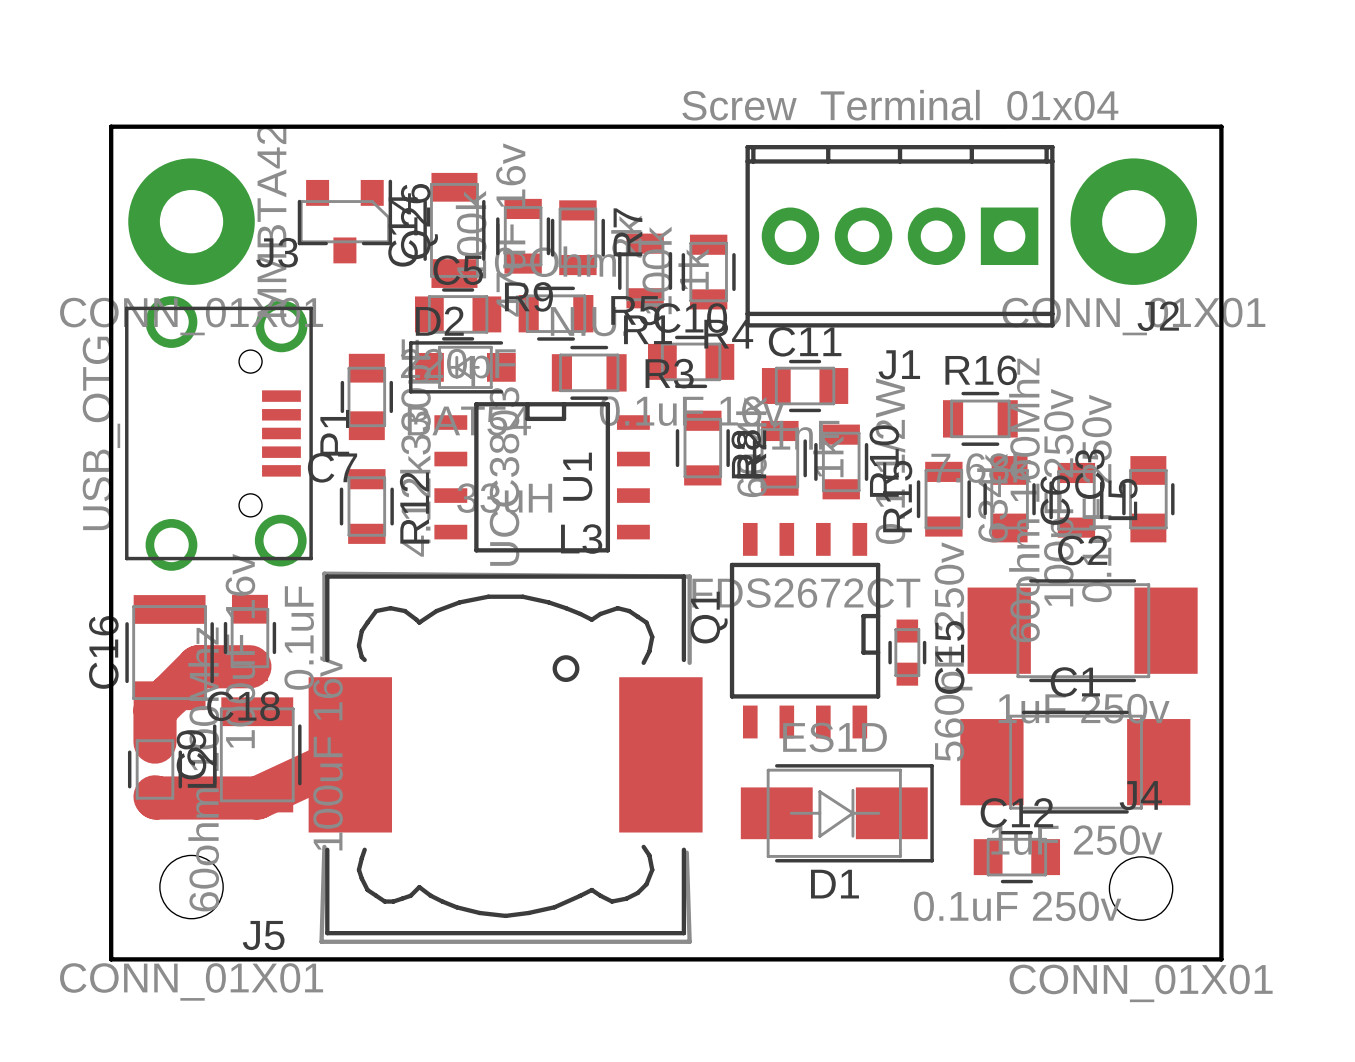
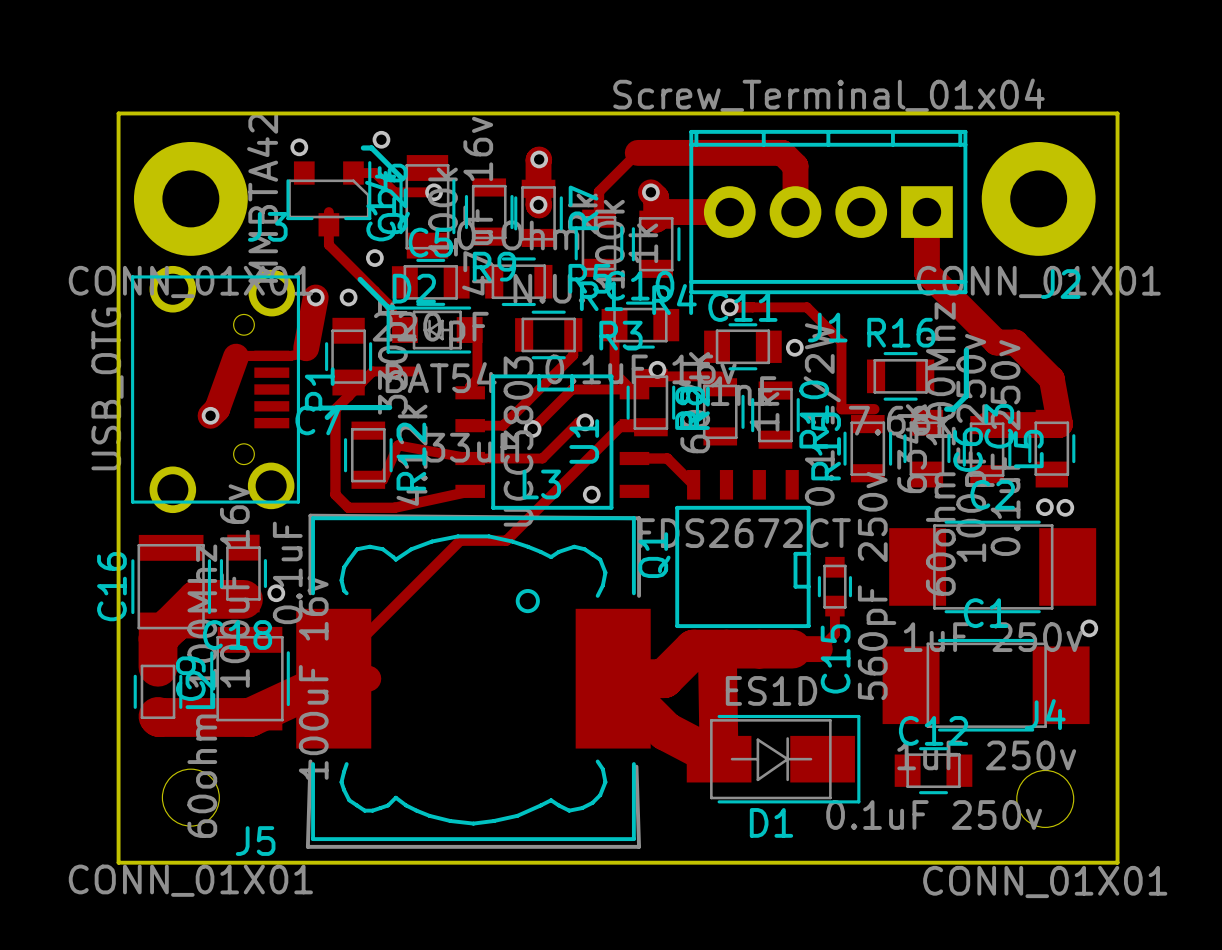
via: none -> (381, 139)
via: none -> (299, 147)
line: none -> (363, 147) (371, 147) (401, 177)
track: none -> (539, 159) (539, 205)
via: none -> (539, 159)
track: none -> (353, 173) (375, 173) (394, 192) (434, 192)
via: none -> (434, 192)
track: none -> (650, 192) (656, 197) (656, 219) (663, 212) (729, 212)
via: none -> (650, 192)
via: none -> (538, 204)
track: none -> (328, 212) (328, 244) (388, 304) (401, 330) (412, 330)
track: none -> (795, 212) (795, 166) (782, 152) (637, 152) (598, 191) (598, 218)
track: none -> (926, 212) (926, 272) (996, 342) (1015, 342) (1051, 378) (1059, 425) (987, 425)
via: none -> (374, 258)
line: none -> (360, 279) (388, 307) (392, 307)
track: none -> (315, 297) (306, 348) (300, 354) (290, 355) (236, 355) (217, 409) (210, 415)
via: none -> (315, 297)
via: none -> (348, 297)
track: none -> (729, 307) (807, 307) (841, 341) (841, 409) (874, 409)
via: none -> (729, 307)
track: none -> (614, 325) (614, 372) (634, 392)
track: none -> (477, 330) (477, 378) (470, 386) (470, 392)
track: none -> (573, 334) (573, 355) (503, 425) (470, 425)
via: none -> (794, 347)
line: none -> (966, 350) (966, 396) (953, 409) (946, 409)
track: none -> (657, 369) (664, 376) (720, 376)
via: none -> (657, 369)
track: none -> (414, 371) (372, 371) (335, 409) (335, 494) (348, 507) (394, 507) (470, 491)
track: none -> (631, 389) (572, 389) (532, 428)
line: none -> (389, 407) (337, 407) (327, 417)
via: none -> (210, 415)
track: none -> (585, 422) (578, 422) (542, 458) (470, 458) (397, 445) (383, 479) (368, 479)
via: none -> (585, 422)
track: none -> (634, 425) (621, 425) (506, 540) (460, 540) (333, 667) (333, 678) (368, 678)
U1 position: (542, 477) -> (552, 442)
via: none -> (532, 428)
R12 position: (366, 506) -> (368, 455)
track: none -> (634, 458) (667, 458) (693, 484)
via: none -> (591, 494)
via: none -> (1044, 507)
via: none -> (1065, 507)
C15 name position: C15 (949, 657) -> C15 (835, 658)
via: none -> (276, 593)
track: none -> (834, 606) (834, 633) (819, 649) (792, 649) (693, 649) (664, 678) (613, 678) (665, 731) (719, 759) (717, 658) (726, 649)
via: none -> (1089, 628)
D1 position: (837, 813) -> (773, 759)

